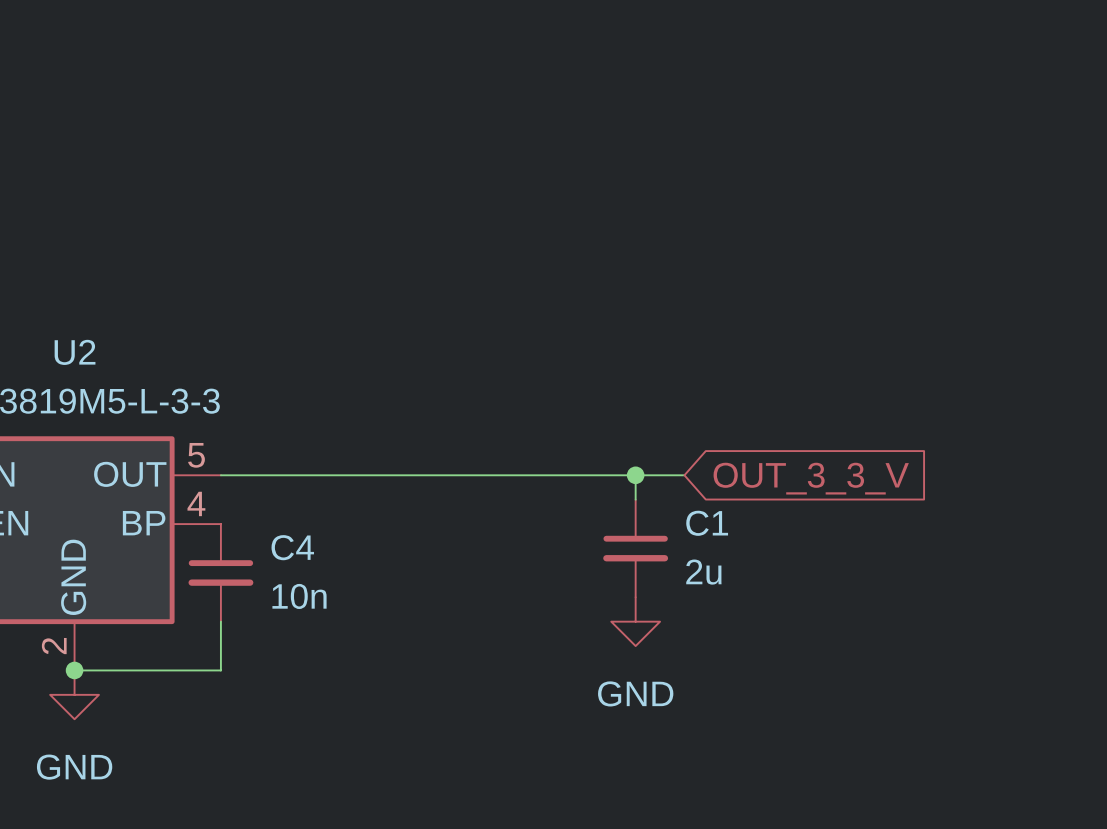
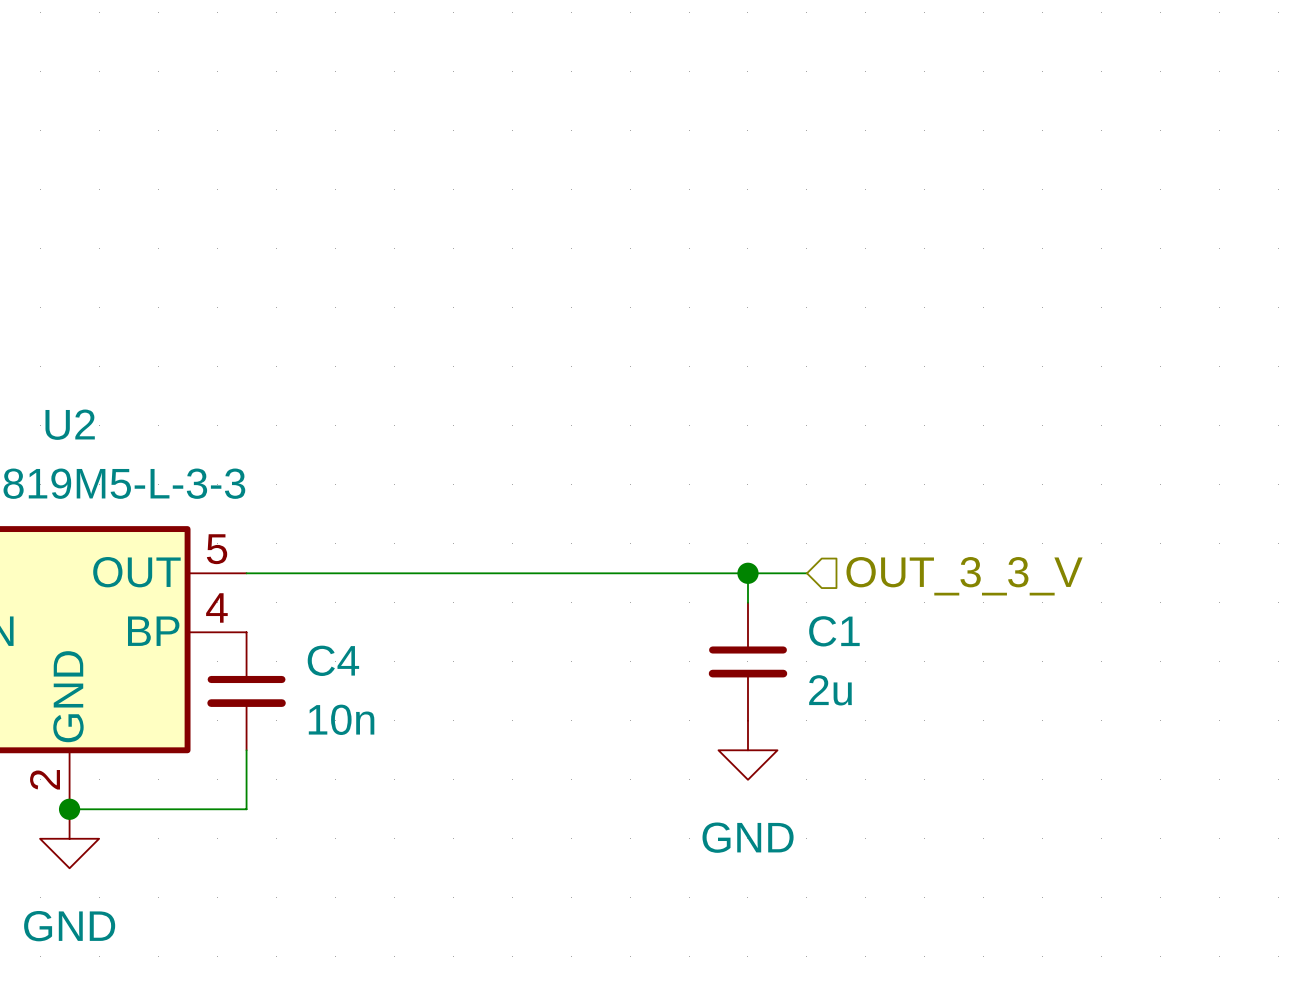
hierarchical label: none -> OUT_3_3_V (964, 576)
global label: OUT_3_3_V (811, 478) -> none

